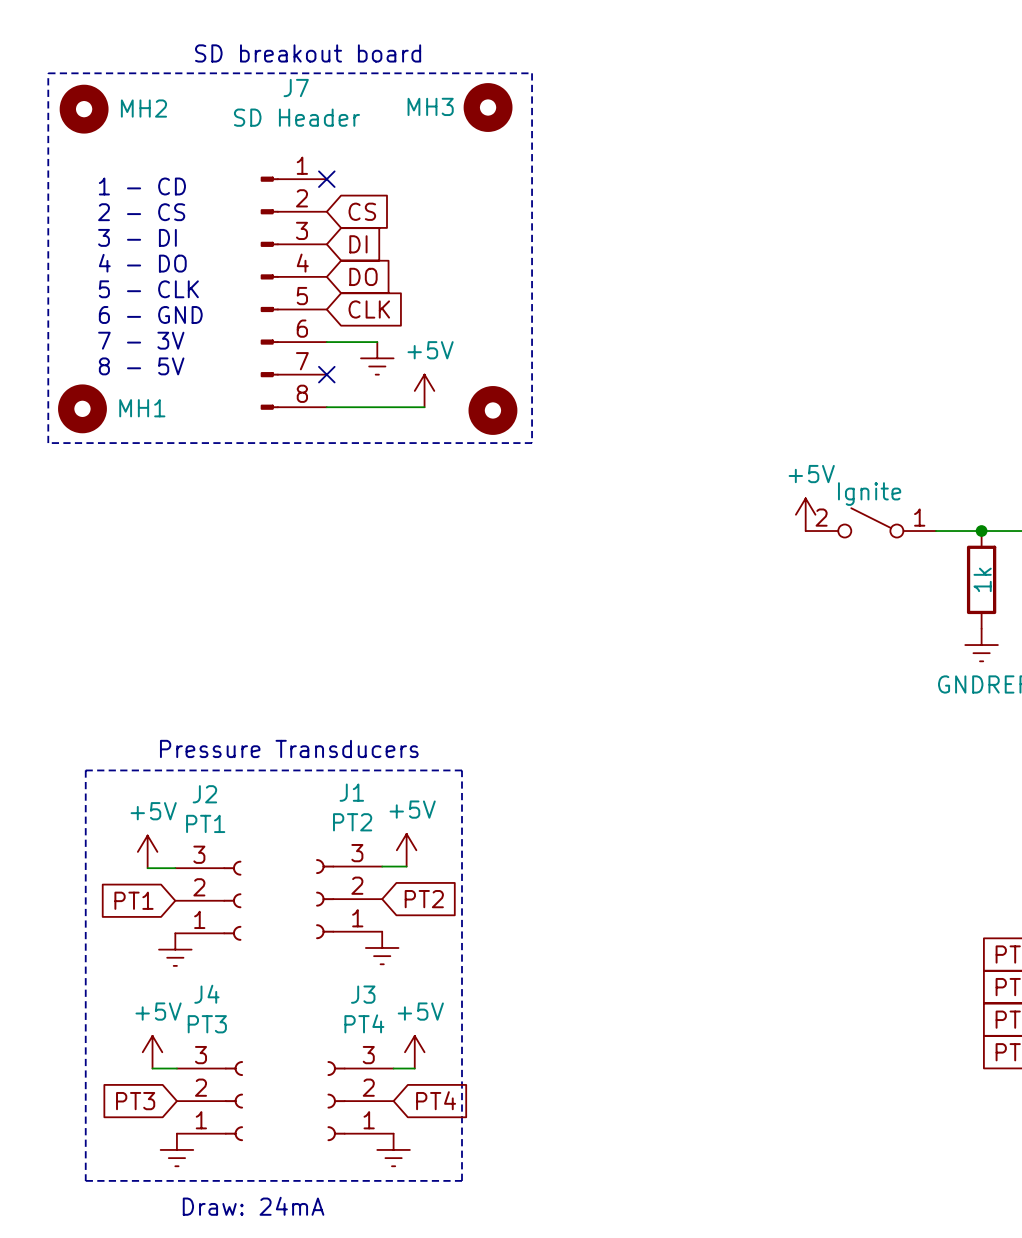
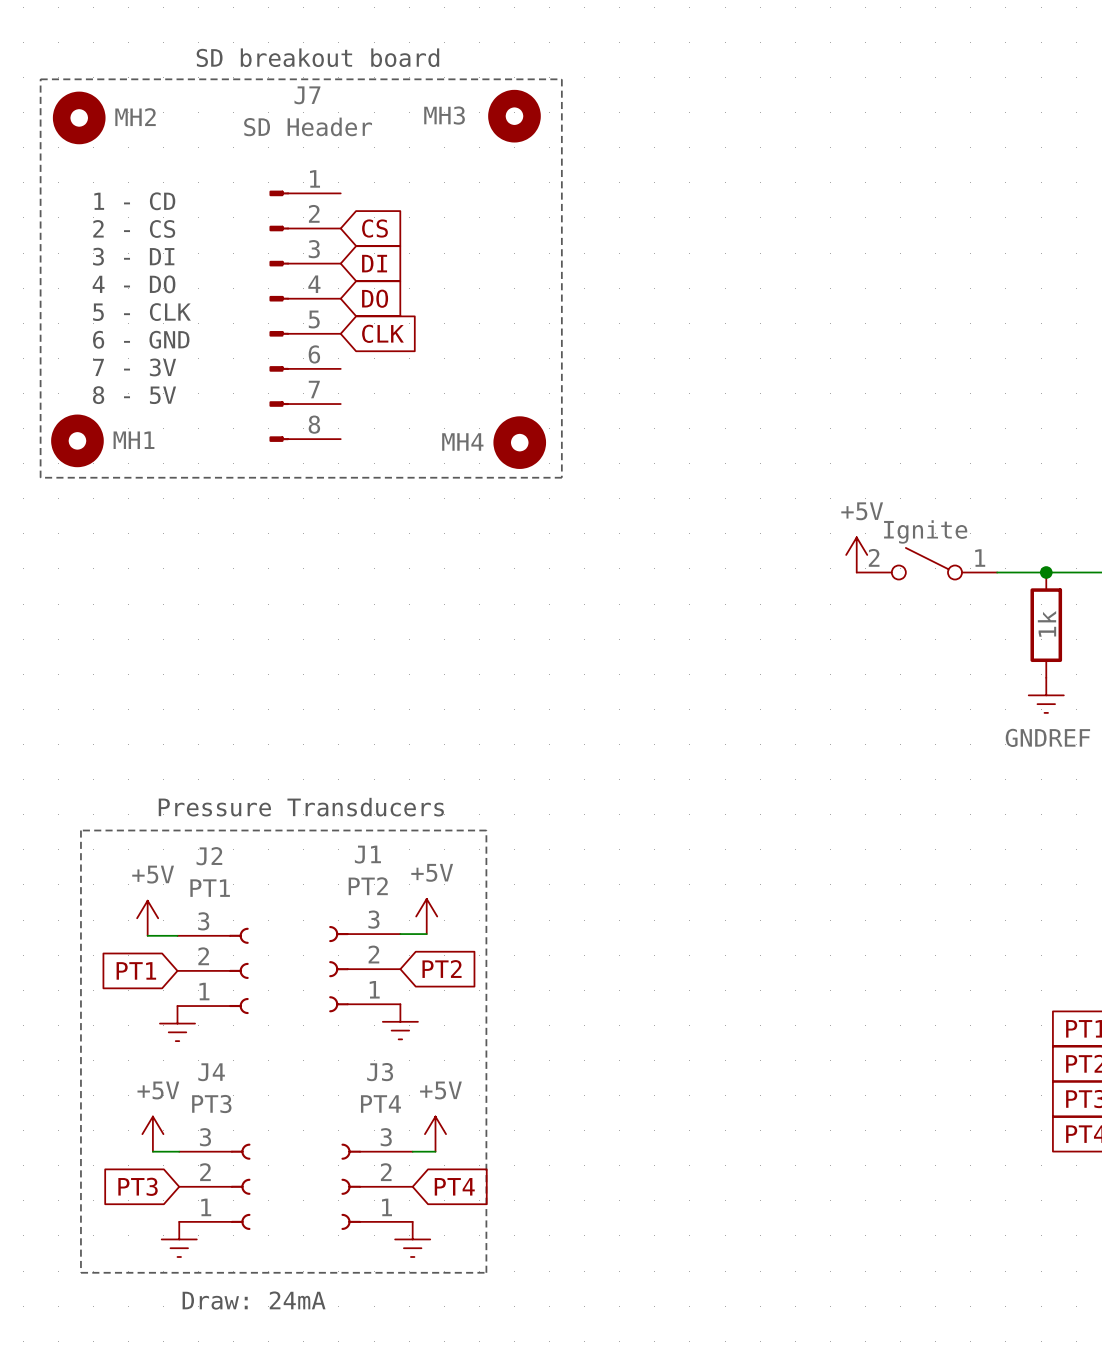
no-connect mark: (326, 179) -> none
wire: (326, 342) (377, 342) -> none
power symbol: (377, 358) -> none
no-connect mark: (326, 374) -> none
power symbol: +5V (424, 390) -> none
wire: (326, 407) (424, 407) -> none
MH4 name: none -> MH4 (462, 441)

